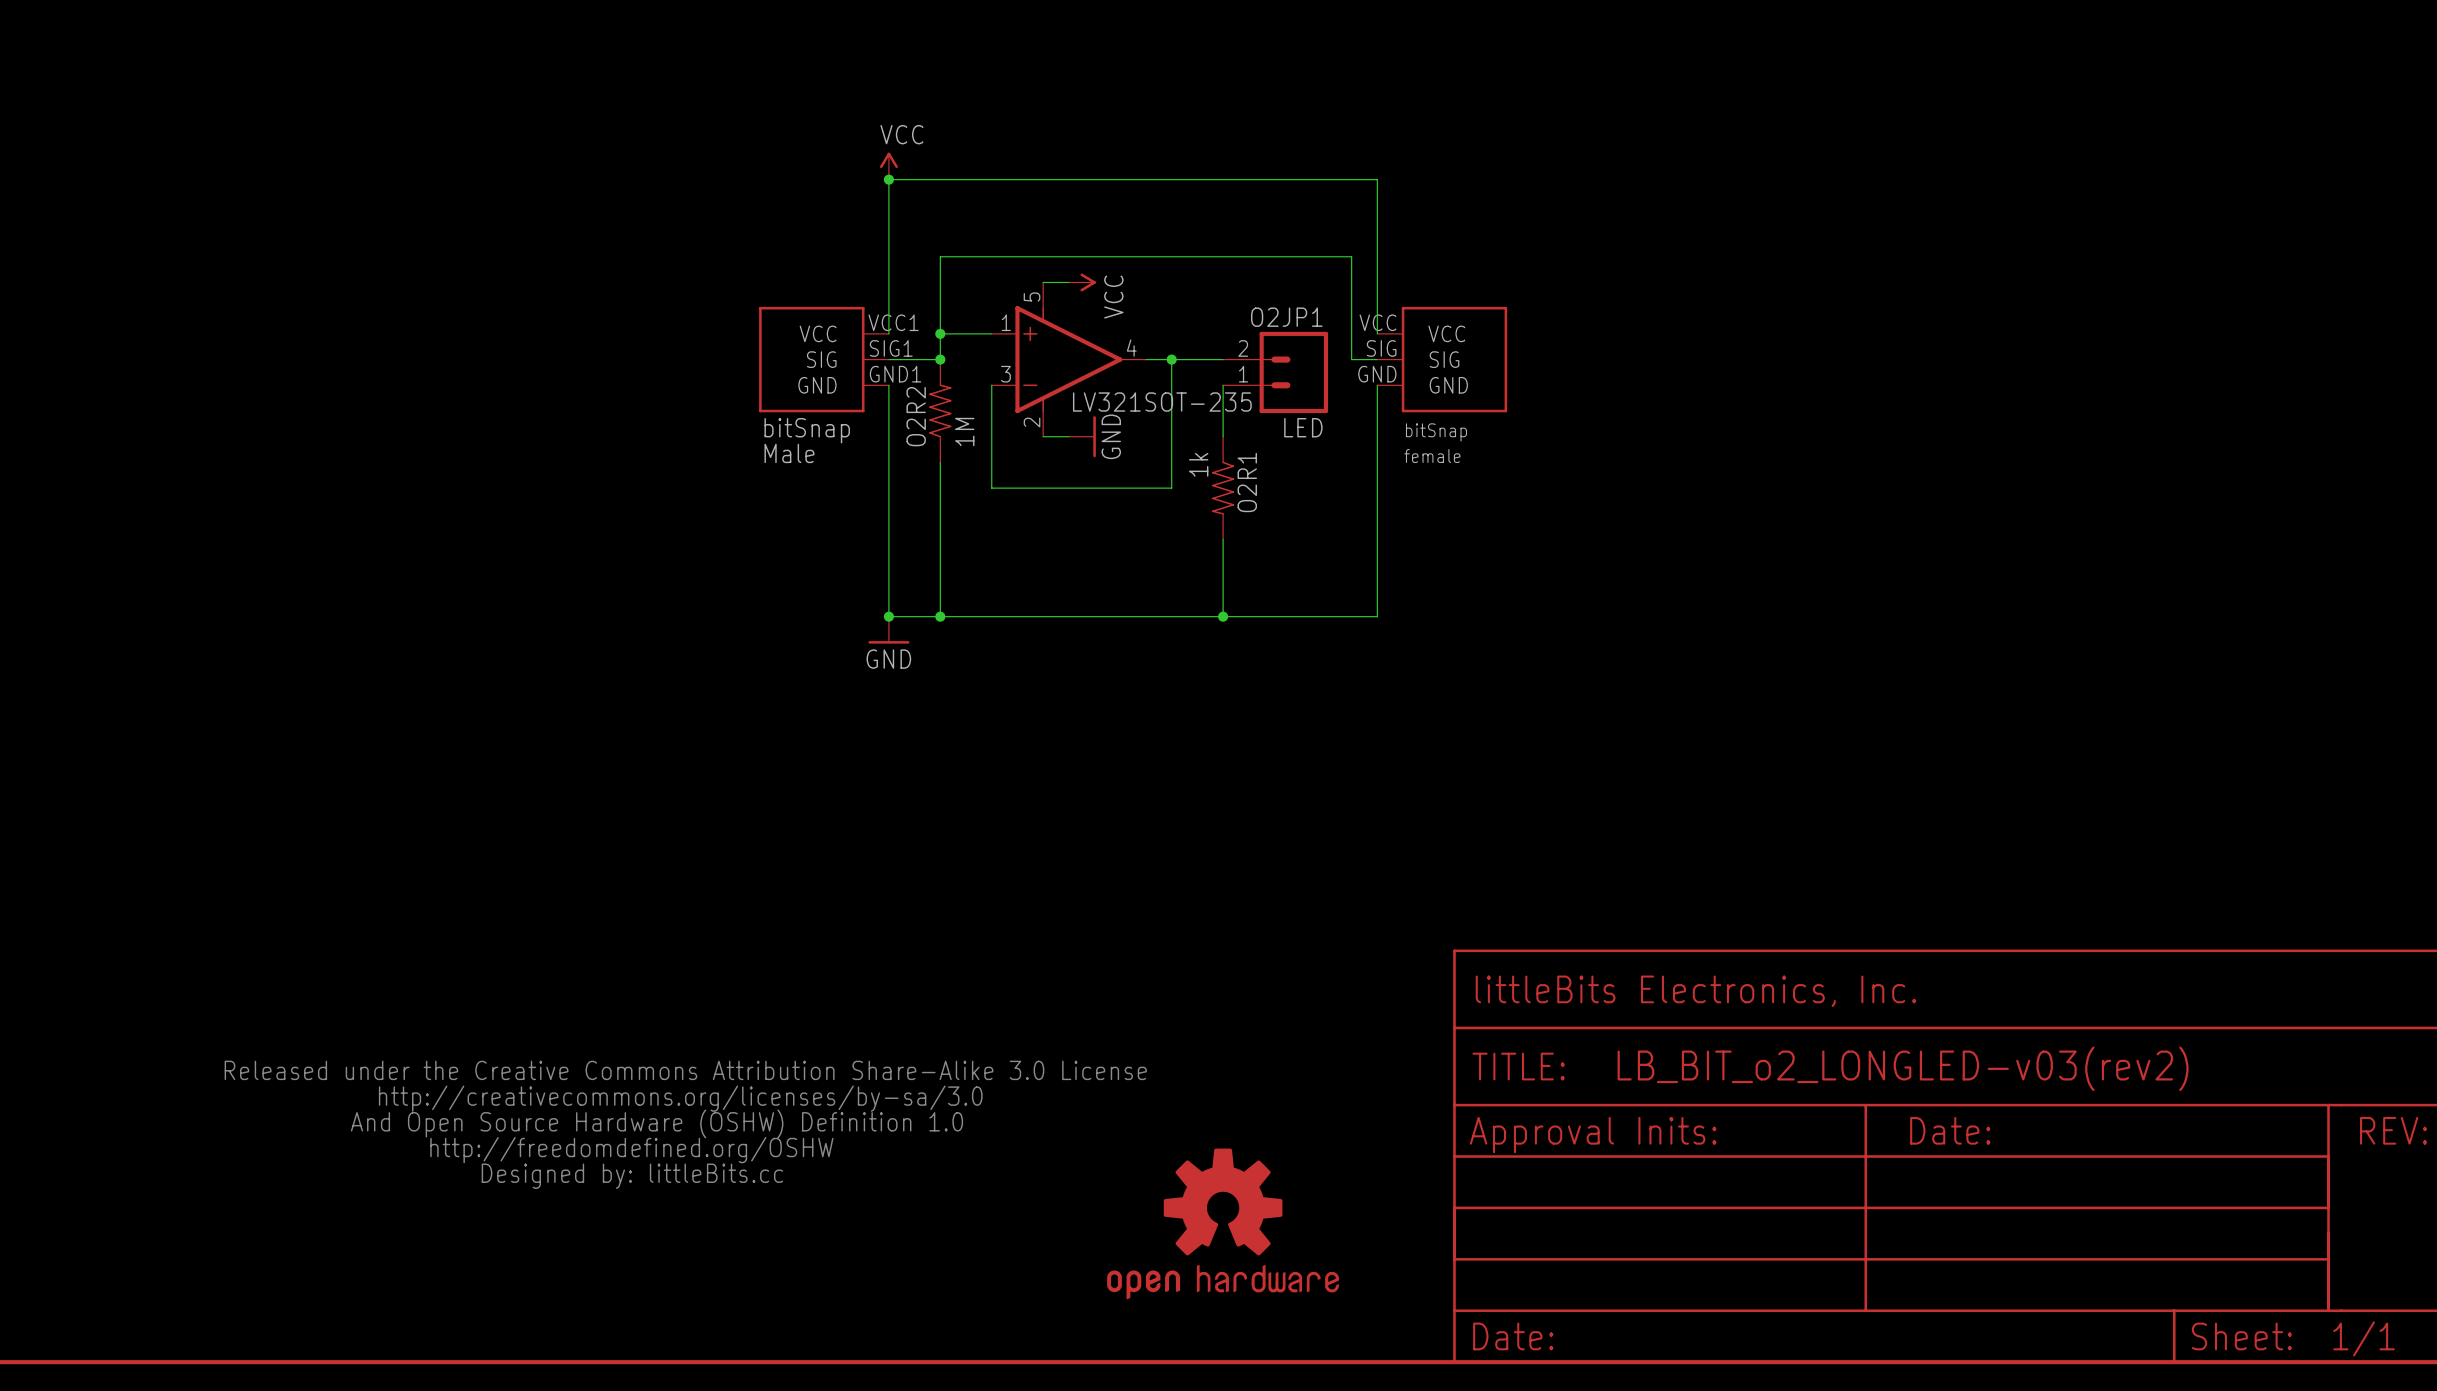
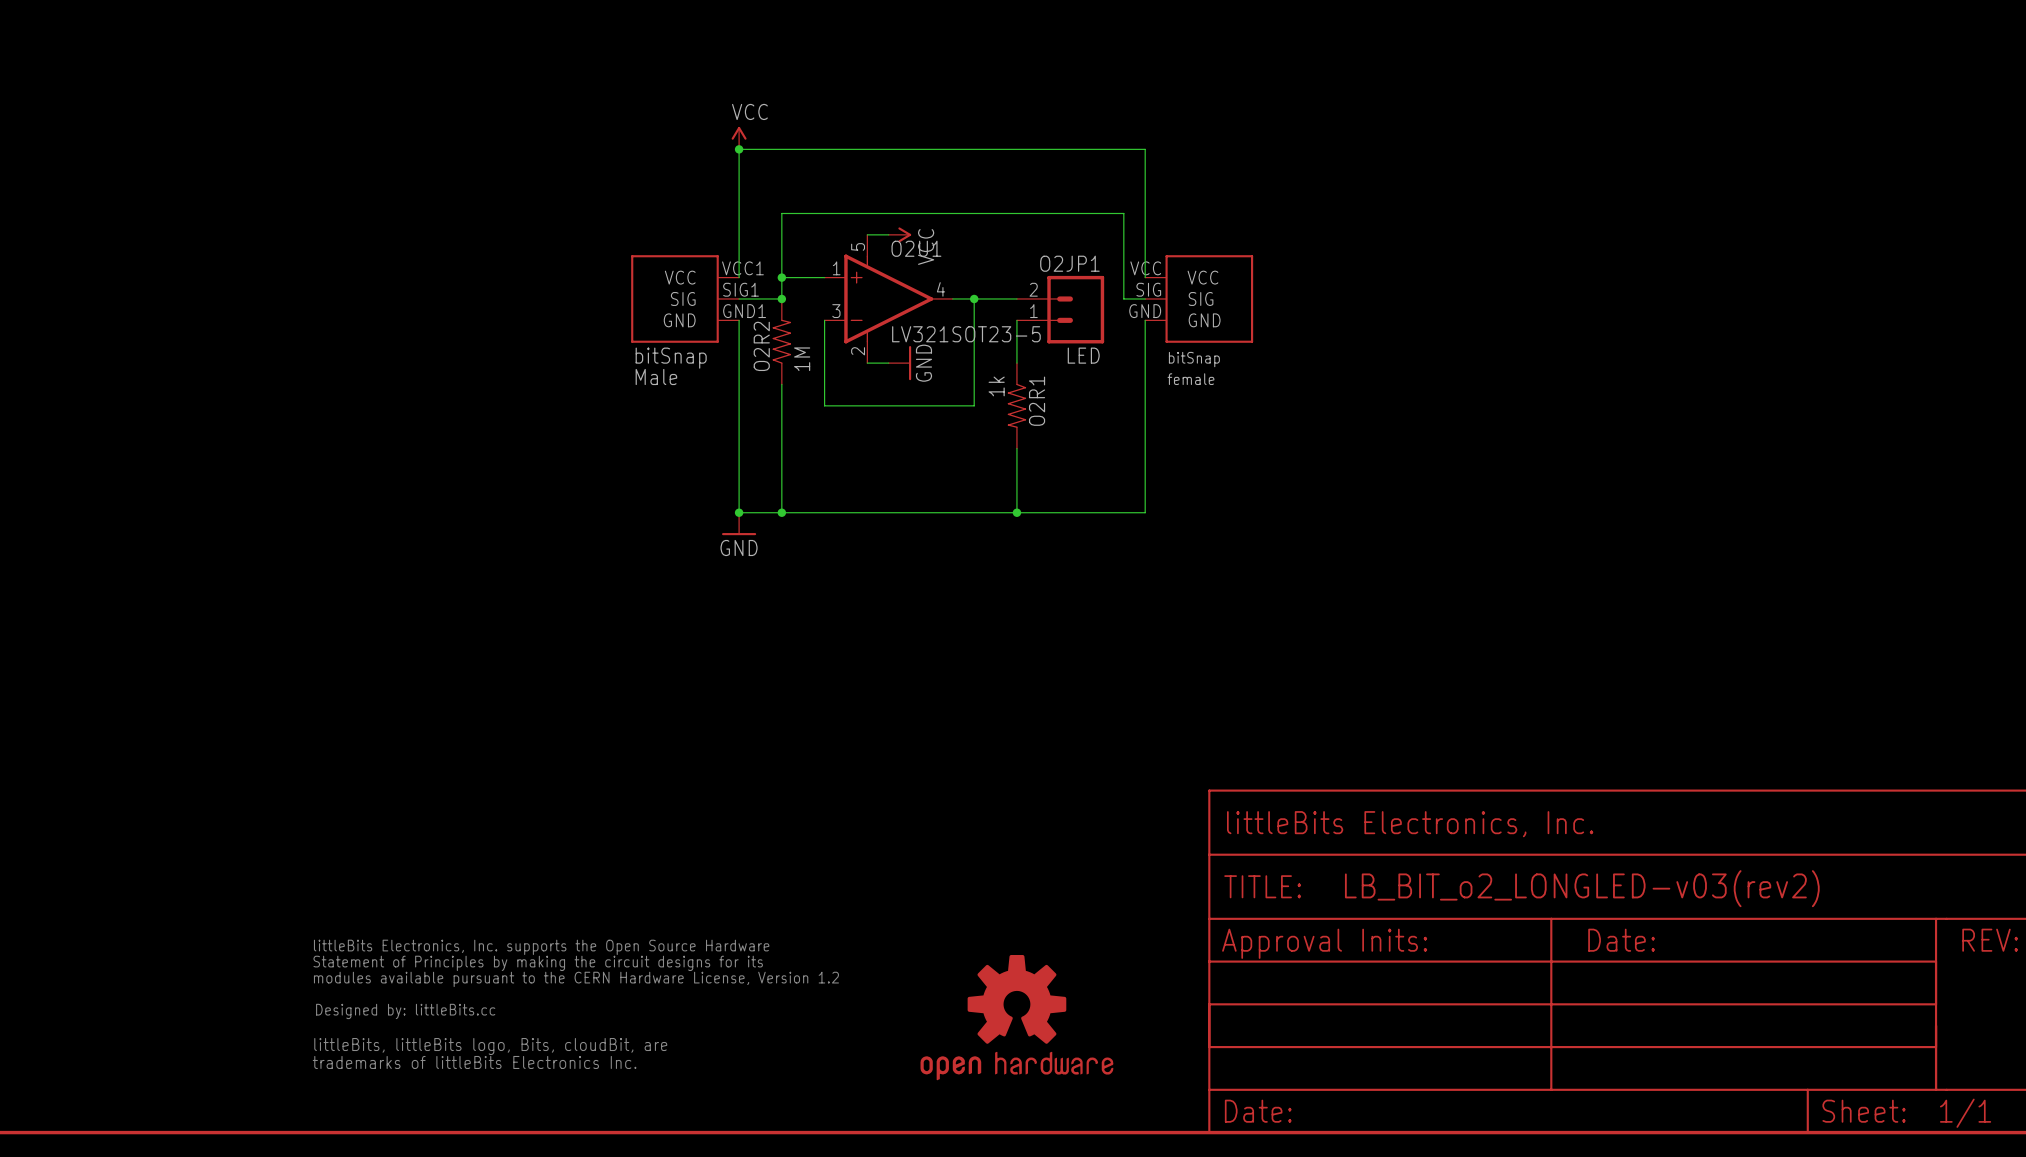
O2U1 name: none -> O2U1 (916, 248)
O2U1 value: LV321SOT-235 (1162, 402) -> LV321SOT23-5 (966, 334)
part: (685, 1124) -> none
part: none -> (575, 1004)

